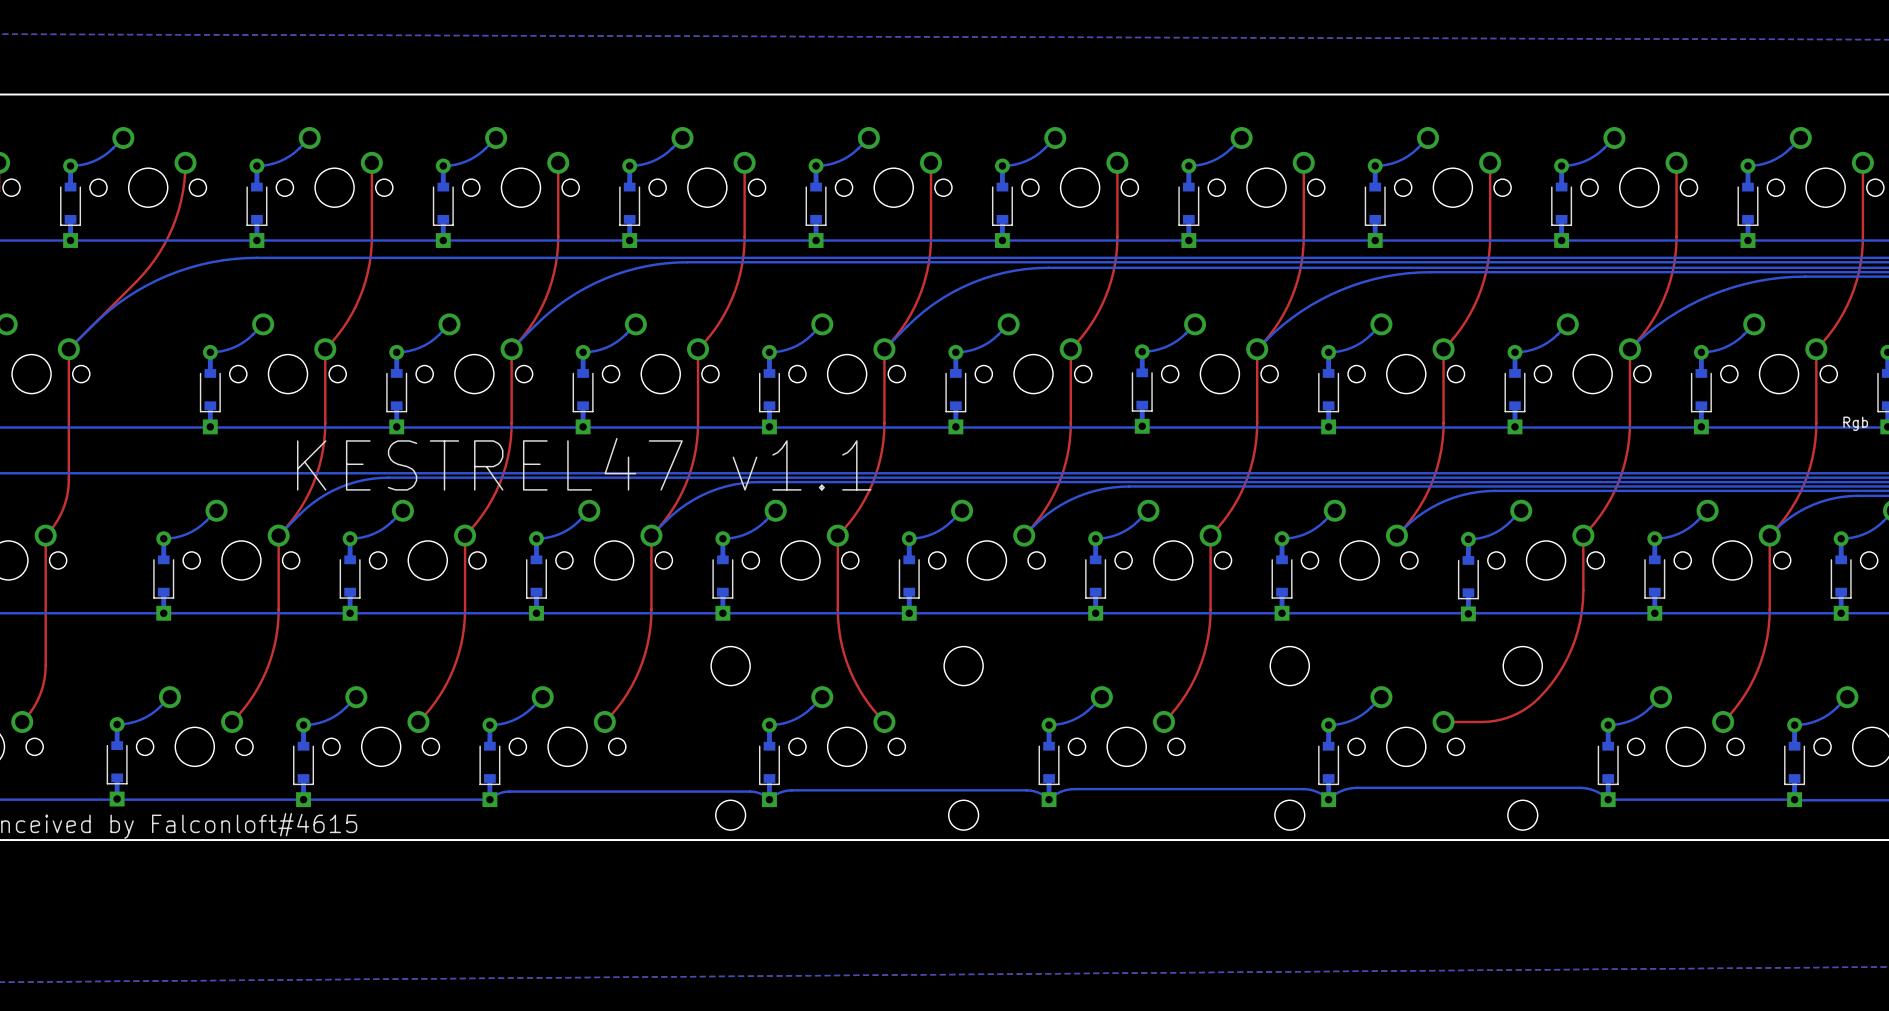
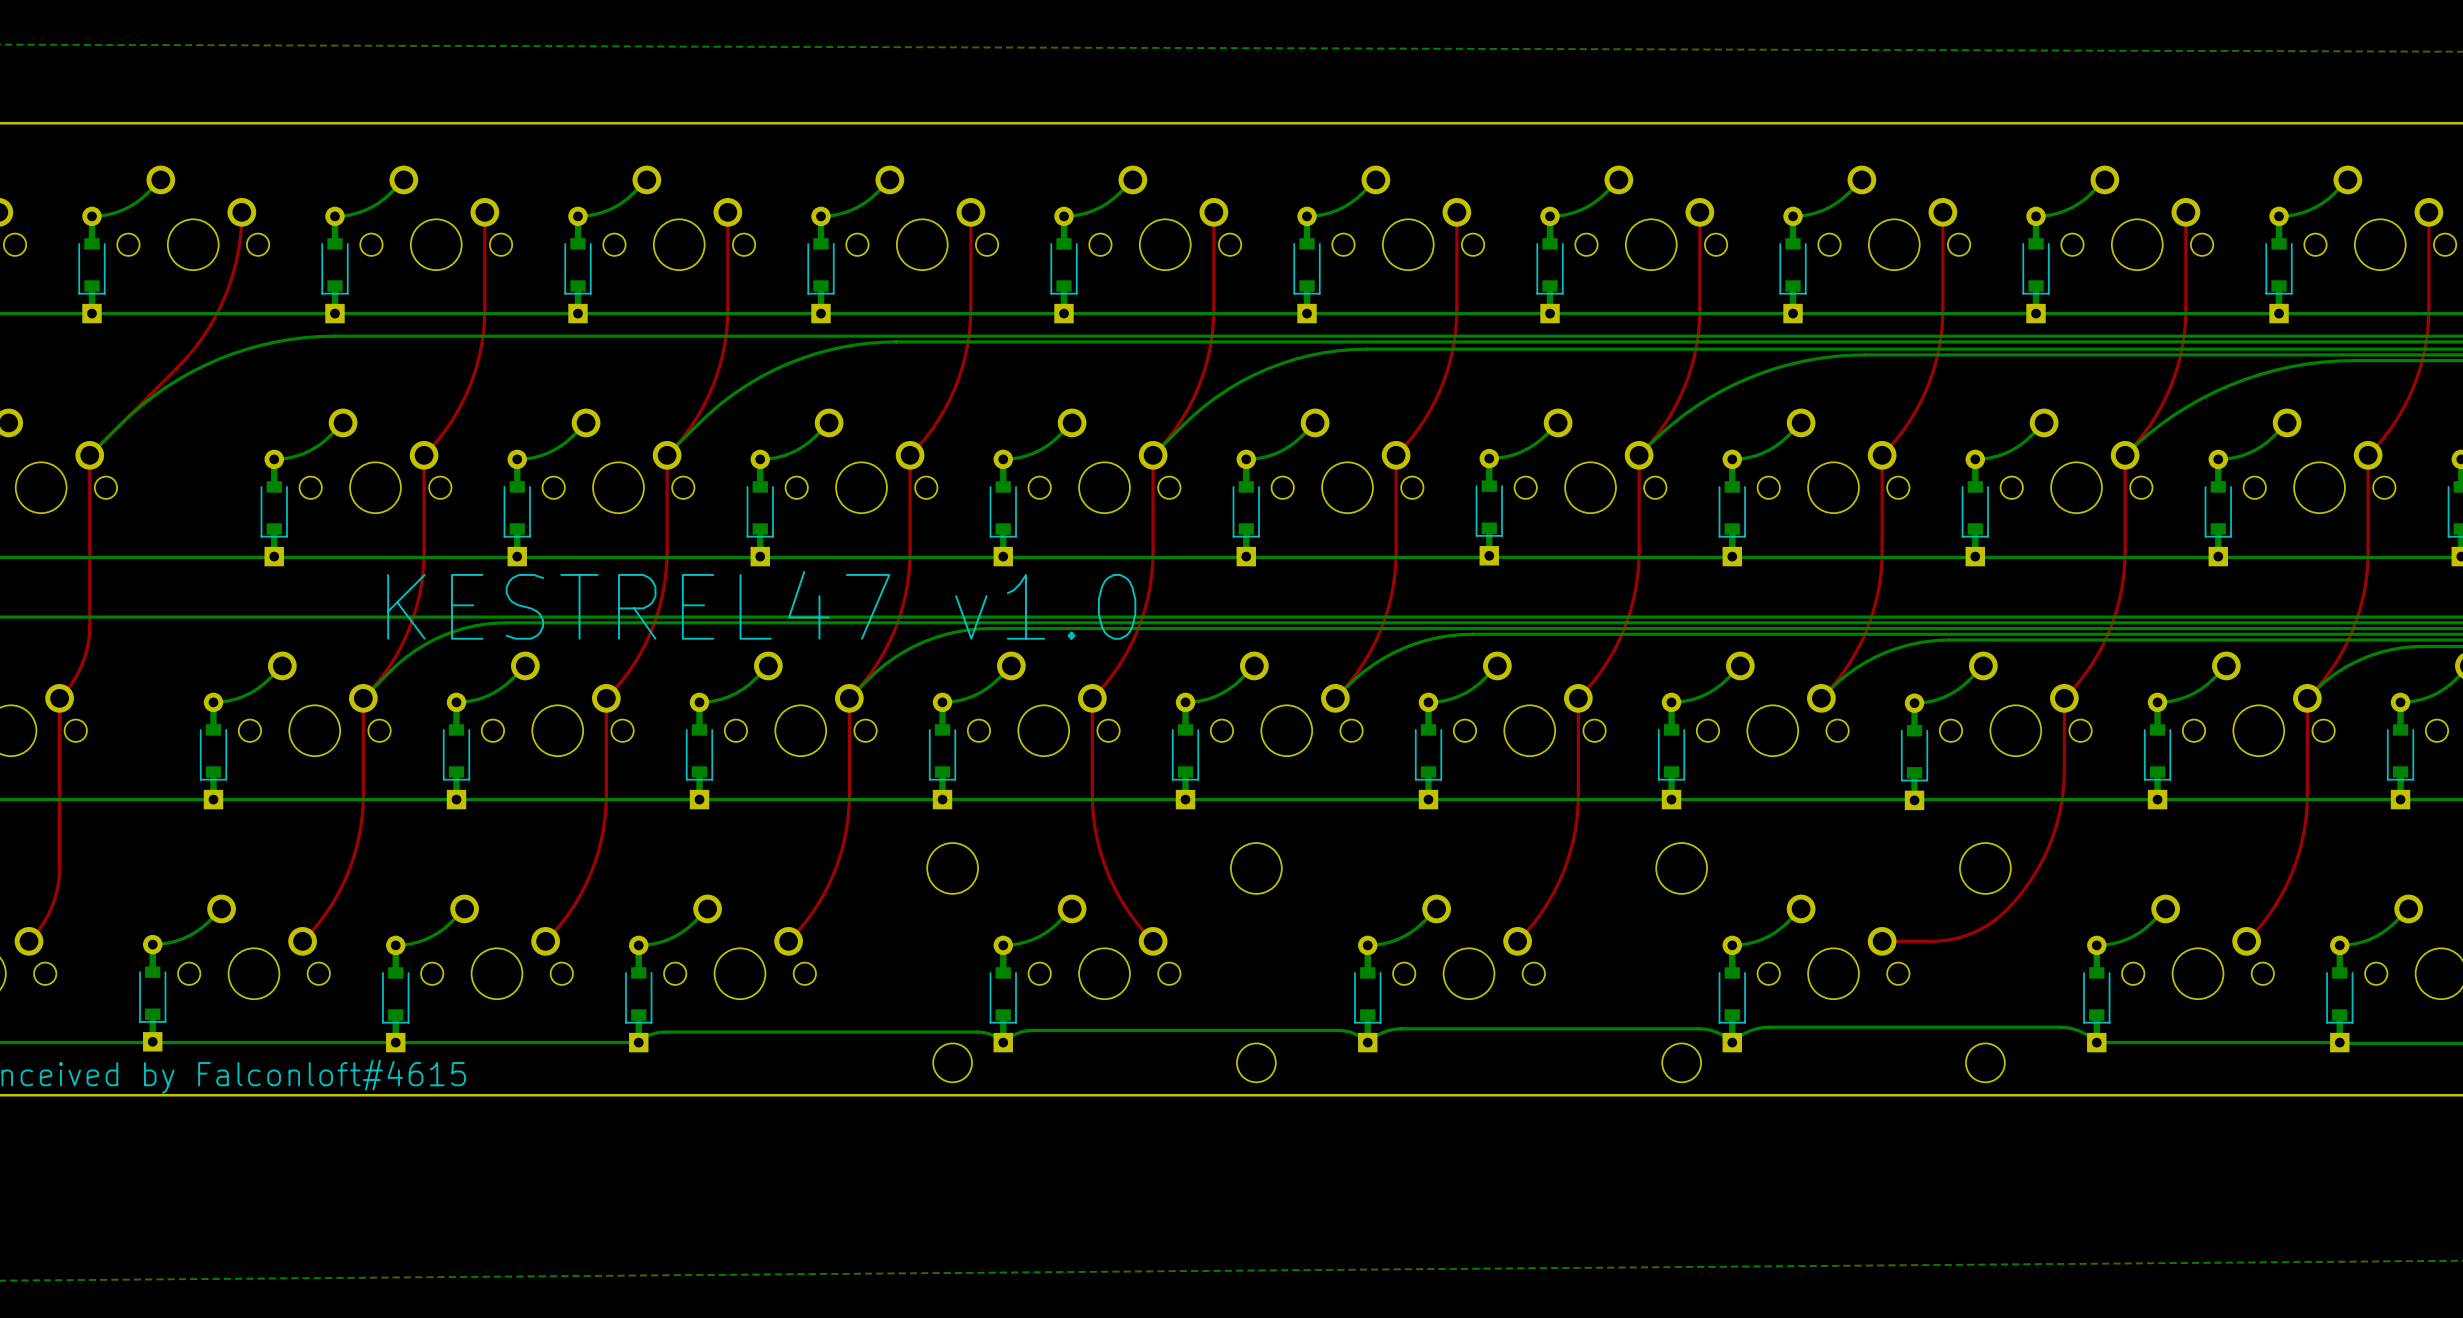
text: Rgb (1855, 423) -> none
text: KESTREL47 v1.1 (584, 464) -> KESTREL47 v1.0 (761, 605)

